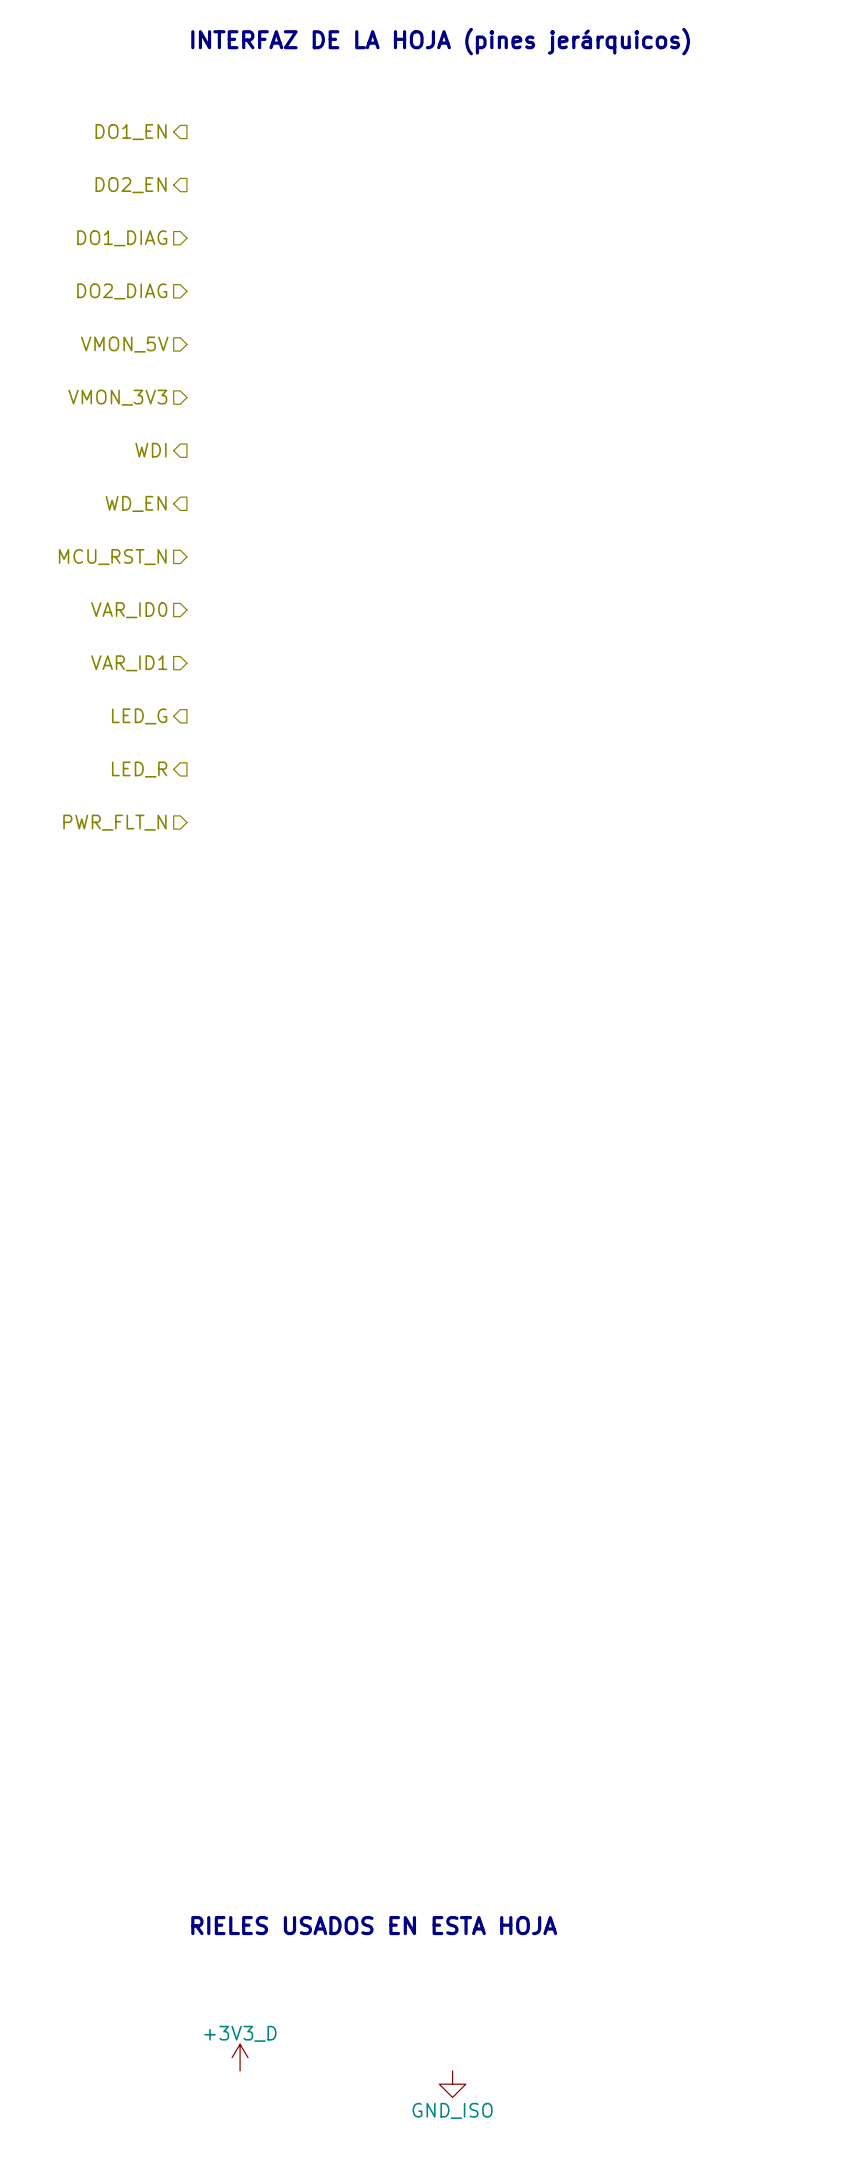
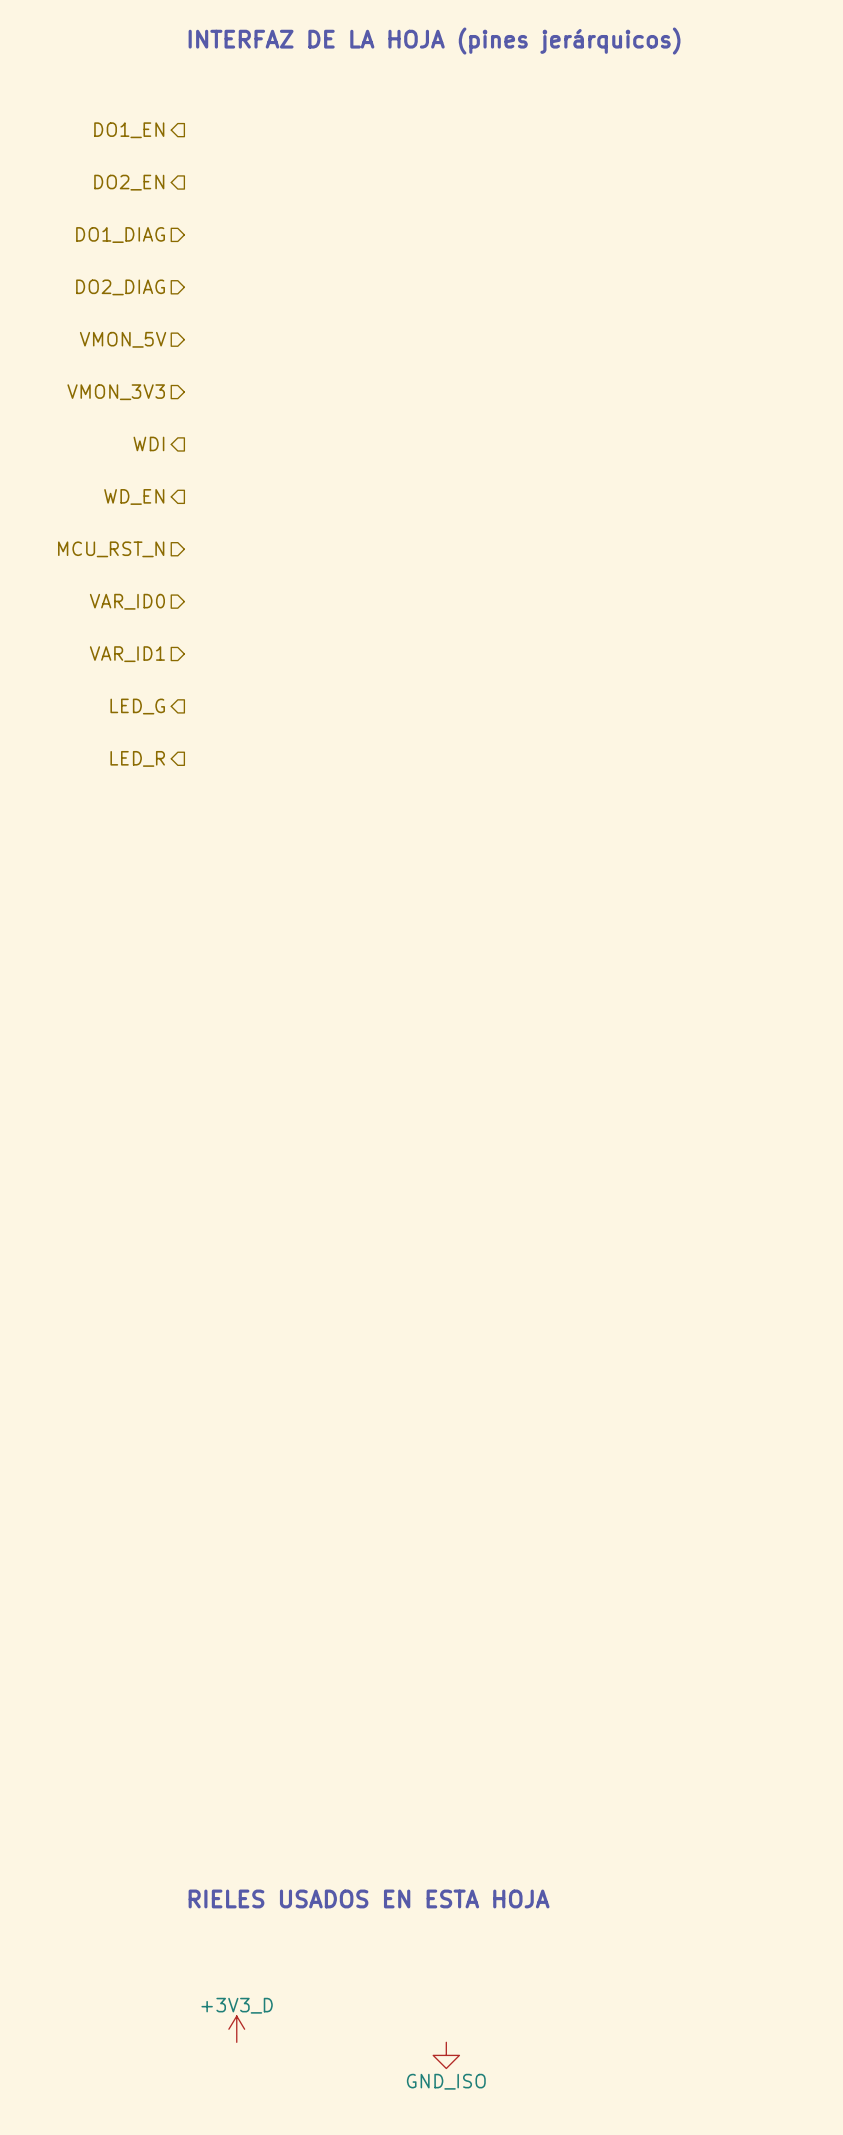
hierarchical label: PWR_FLT_N (114, 822) -> none

